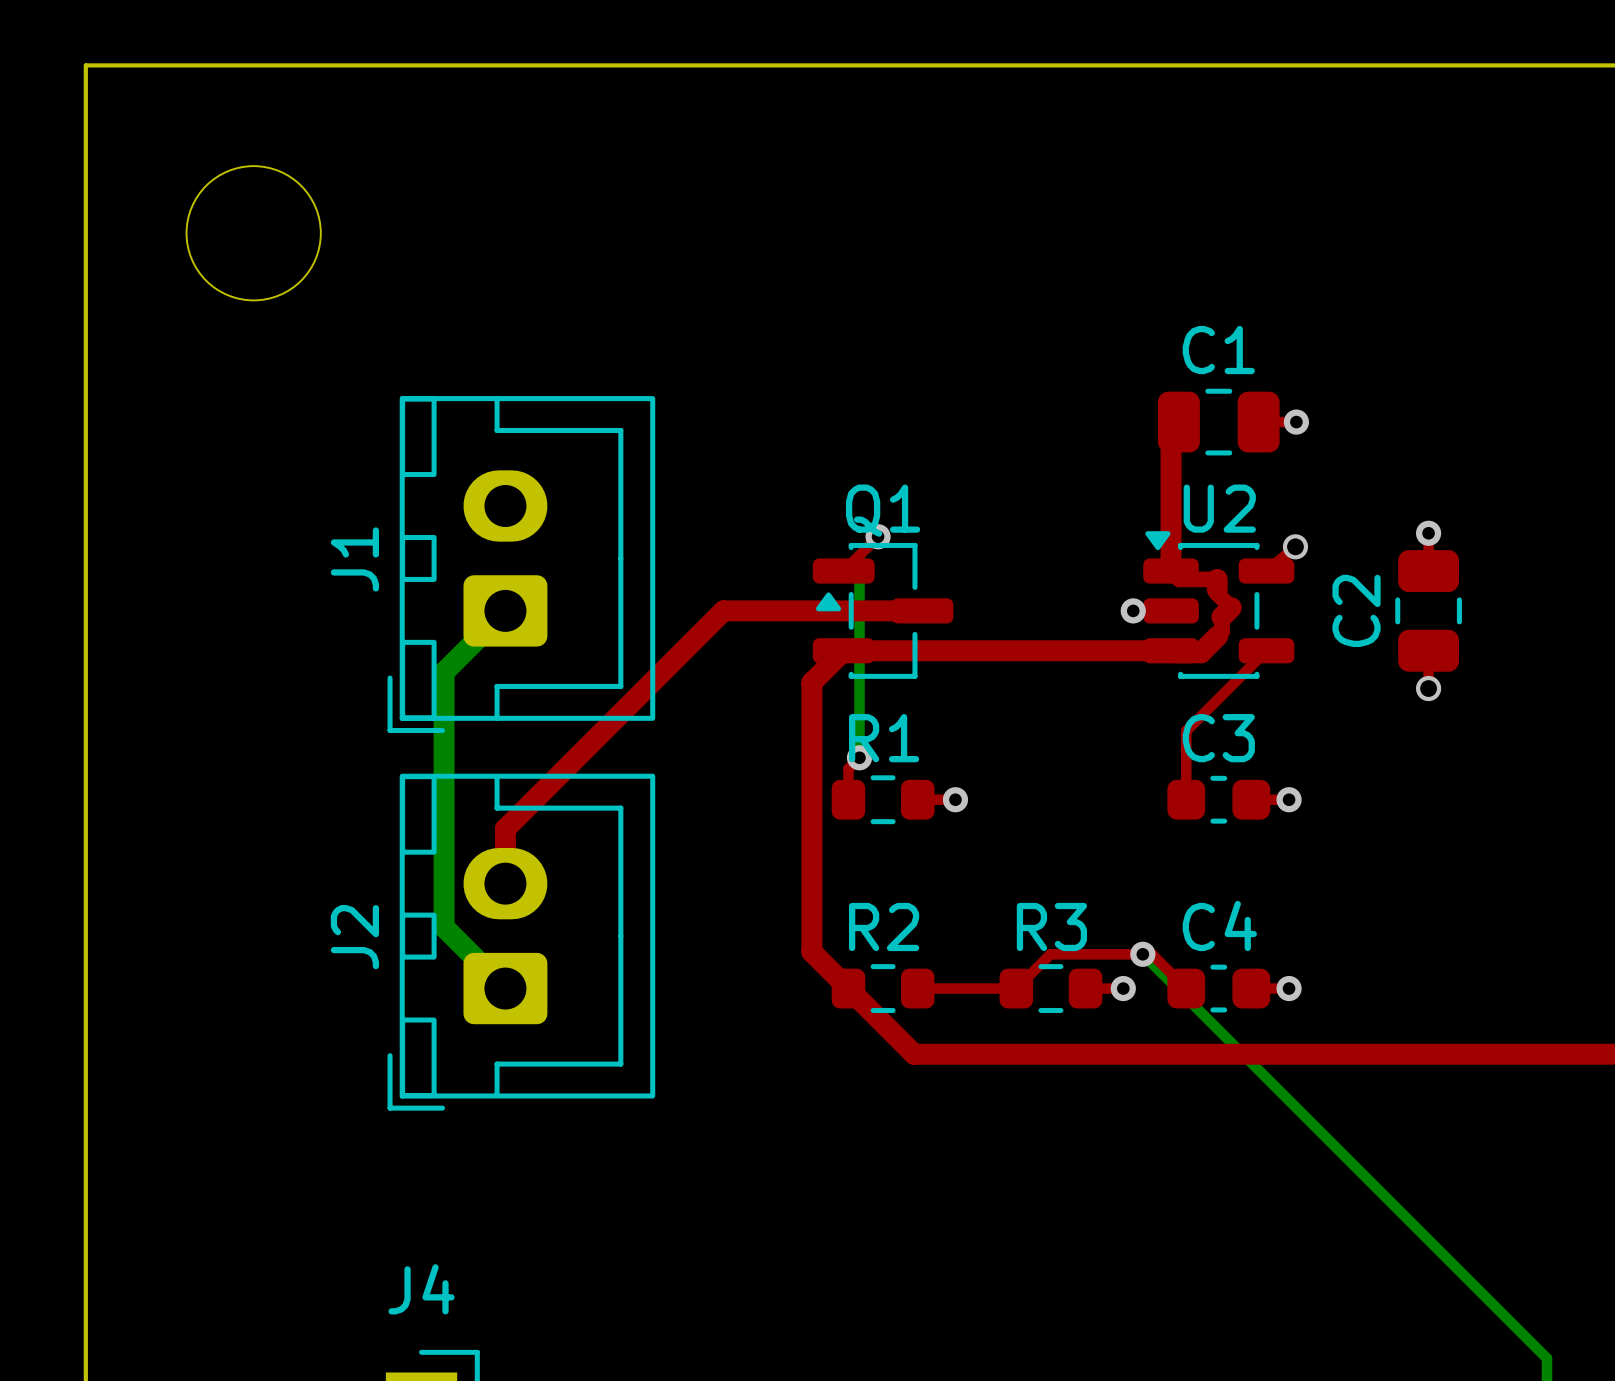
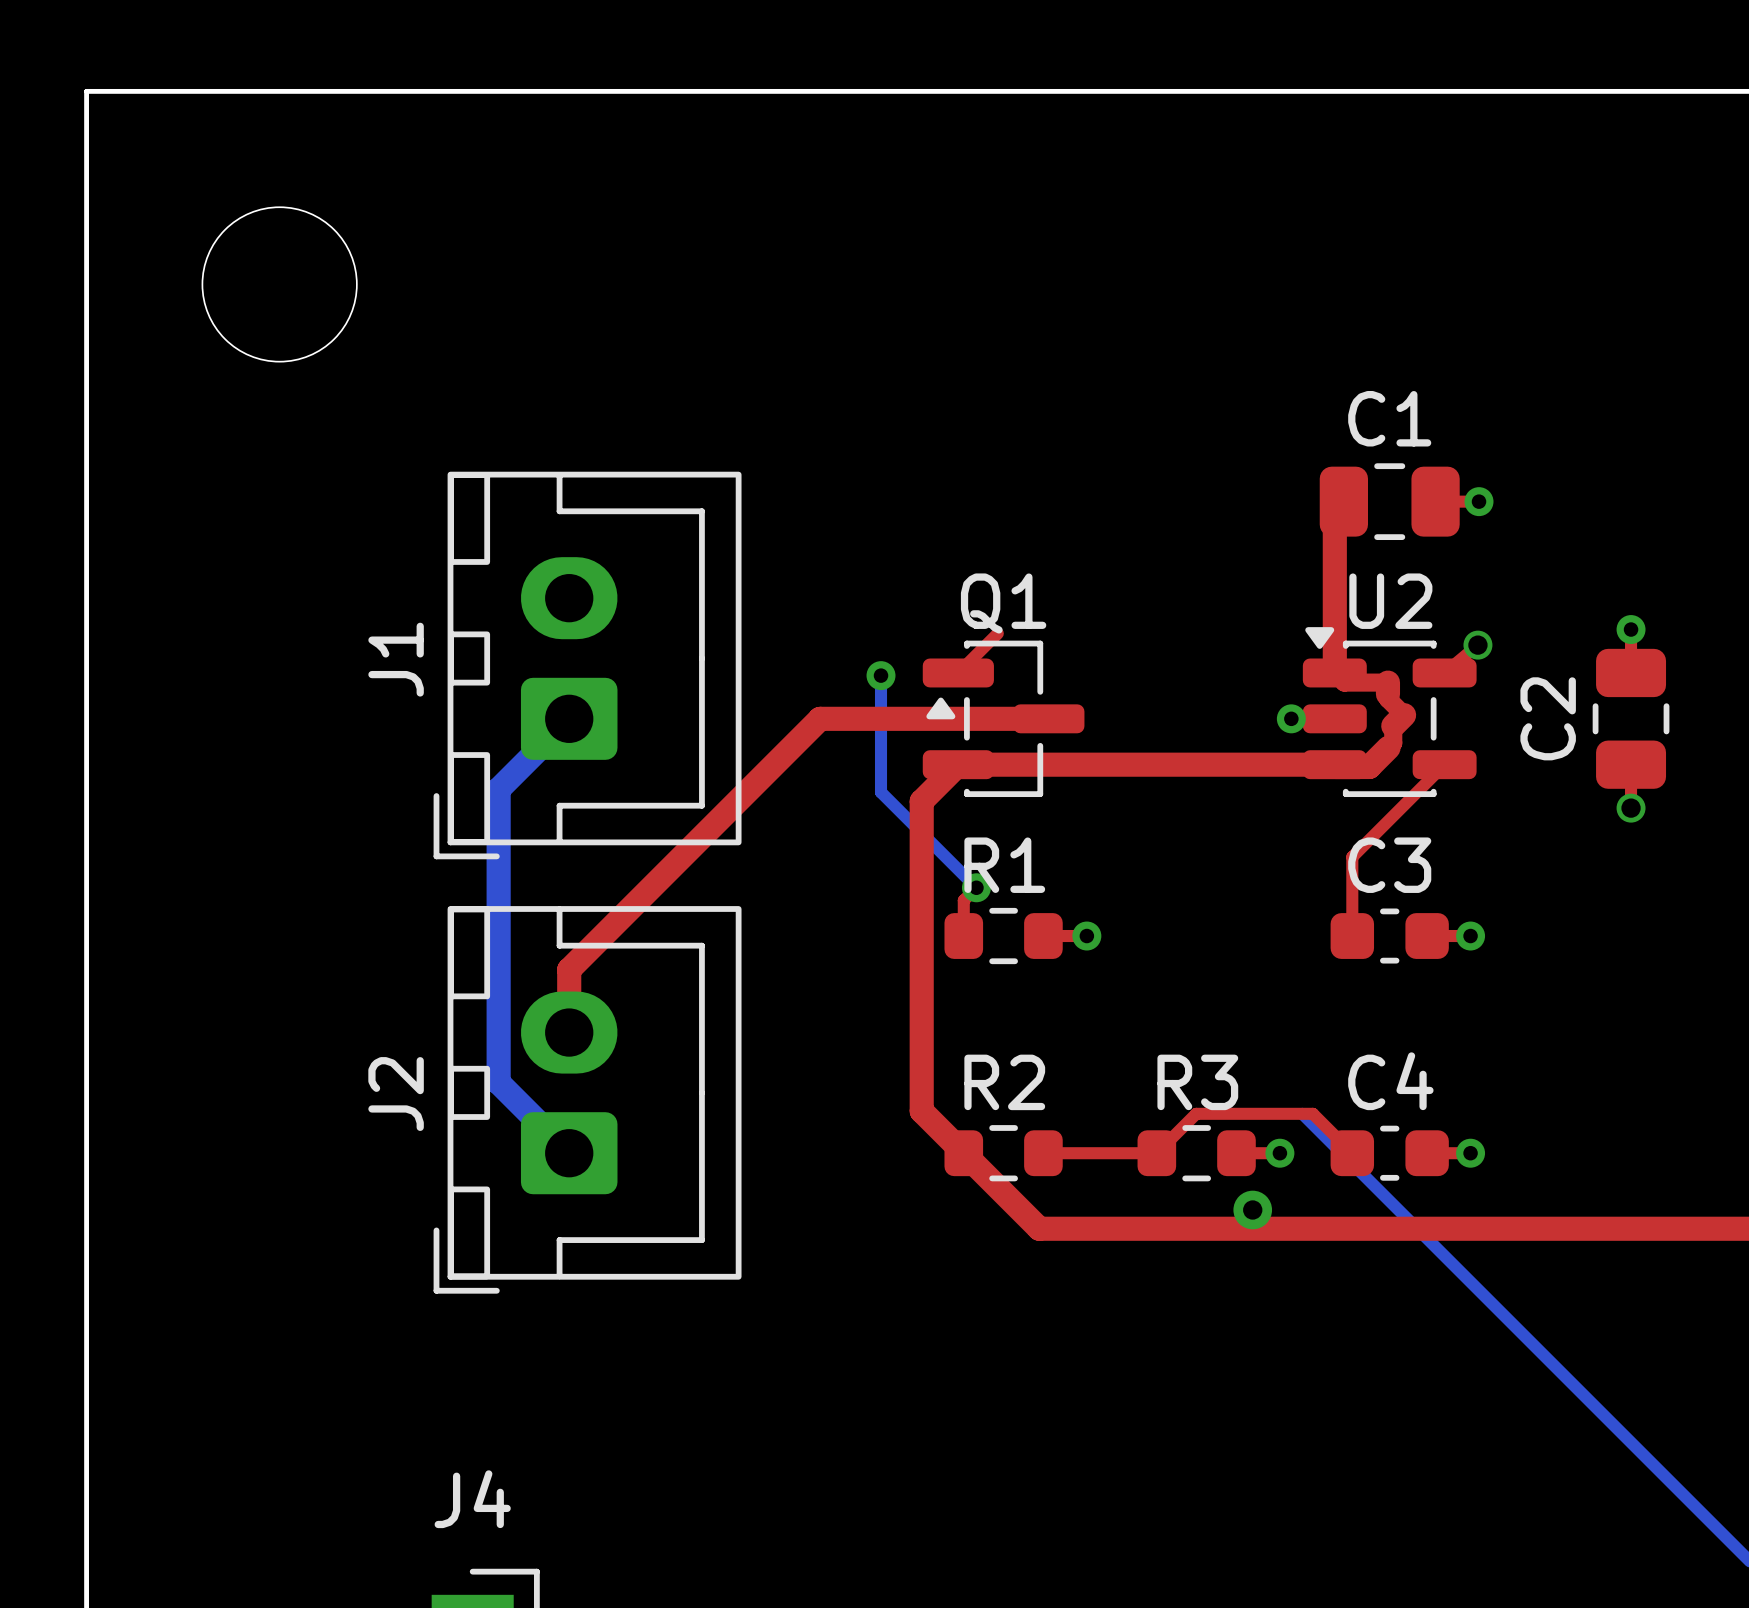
bottom track: (878, 536) (859, 555) (859, 757) -> (881, 675) (881, 792) (976, 887)
via position: (878, 536) -> (881, 675)
via: (1142, 954) -> none
via: none -> (1252, 1209)

